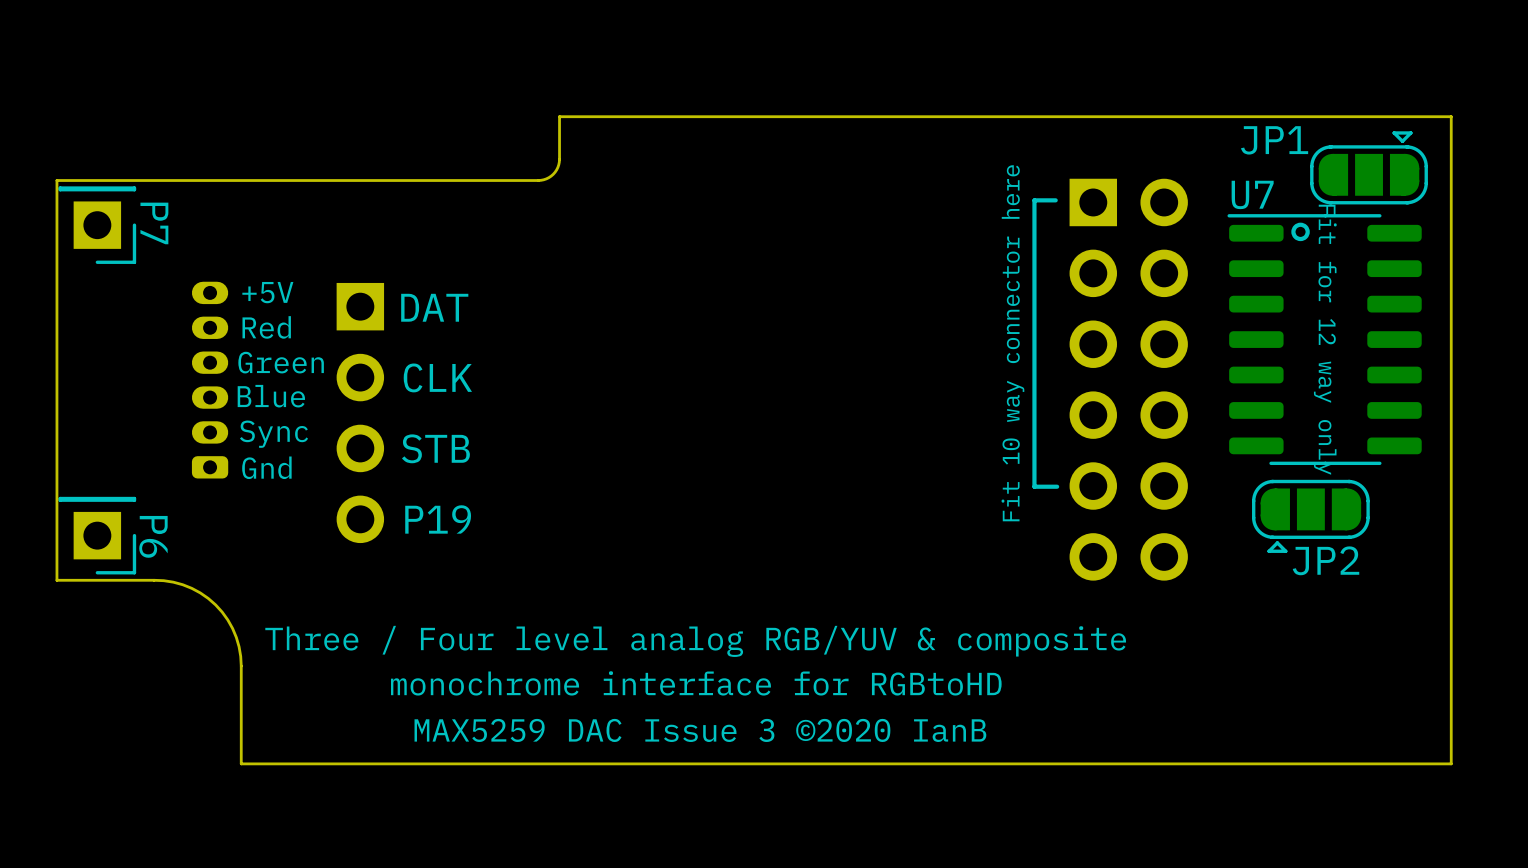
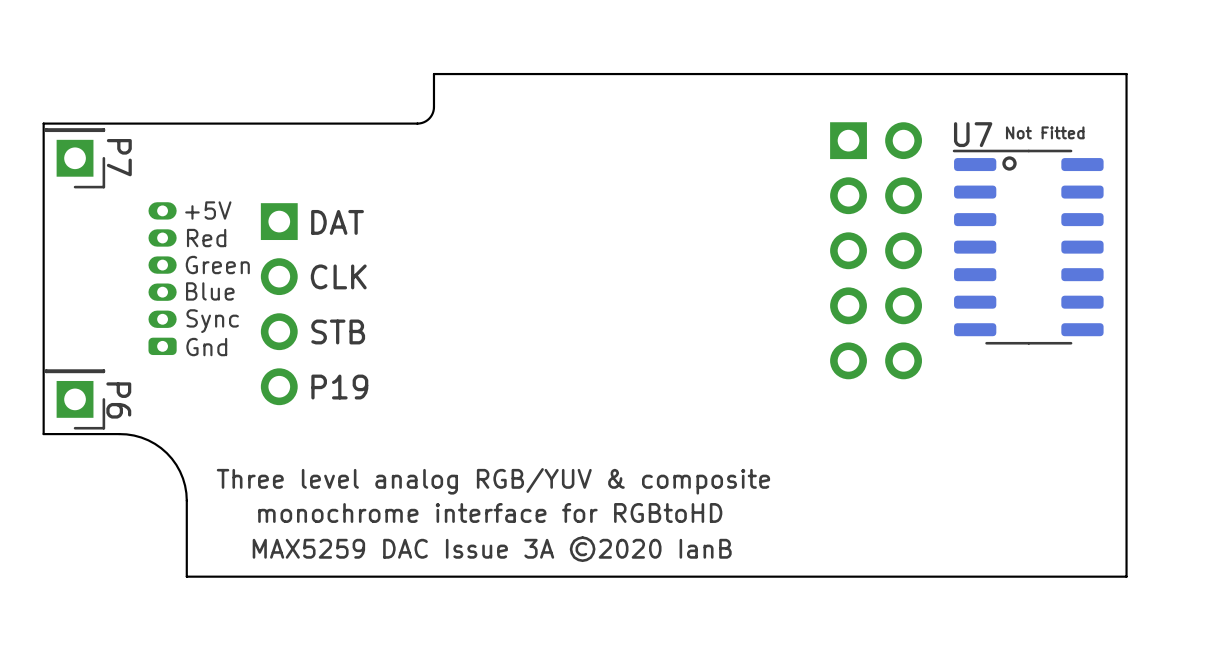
JP1: (1369, 167) -> none
text: none -> Not Fitted (1045, 132)
line: (1055, 200) (1034, 200) (1034, 486) (1057, 486) -> none
text: Fit for 12 way only (1325, 339) -> none
text: Fit 10 way connector here (1012, 343) -> none
part: (1128, 379) -> none
JP2: (1310, 516) -> none
text: Three / Four level analog RGB/YUV & composite (695, 641) -> Three level analog RGB/YUV & composite (493, 481)
text position: monochrome interface for RGBtoHD (696, 683) -> monochrome interface for RGBtoHD (490, 512)
text: MAX5259 DAC Issue 3 ©2020 IanB (700, 730) -> MAX5259 DAC Issue 3A ©2020 IanB (492, 549)

